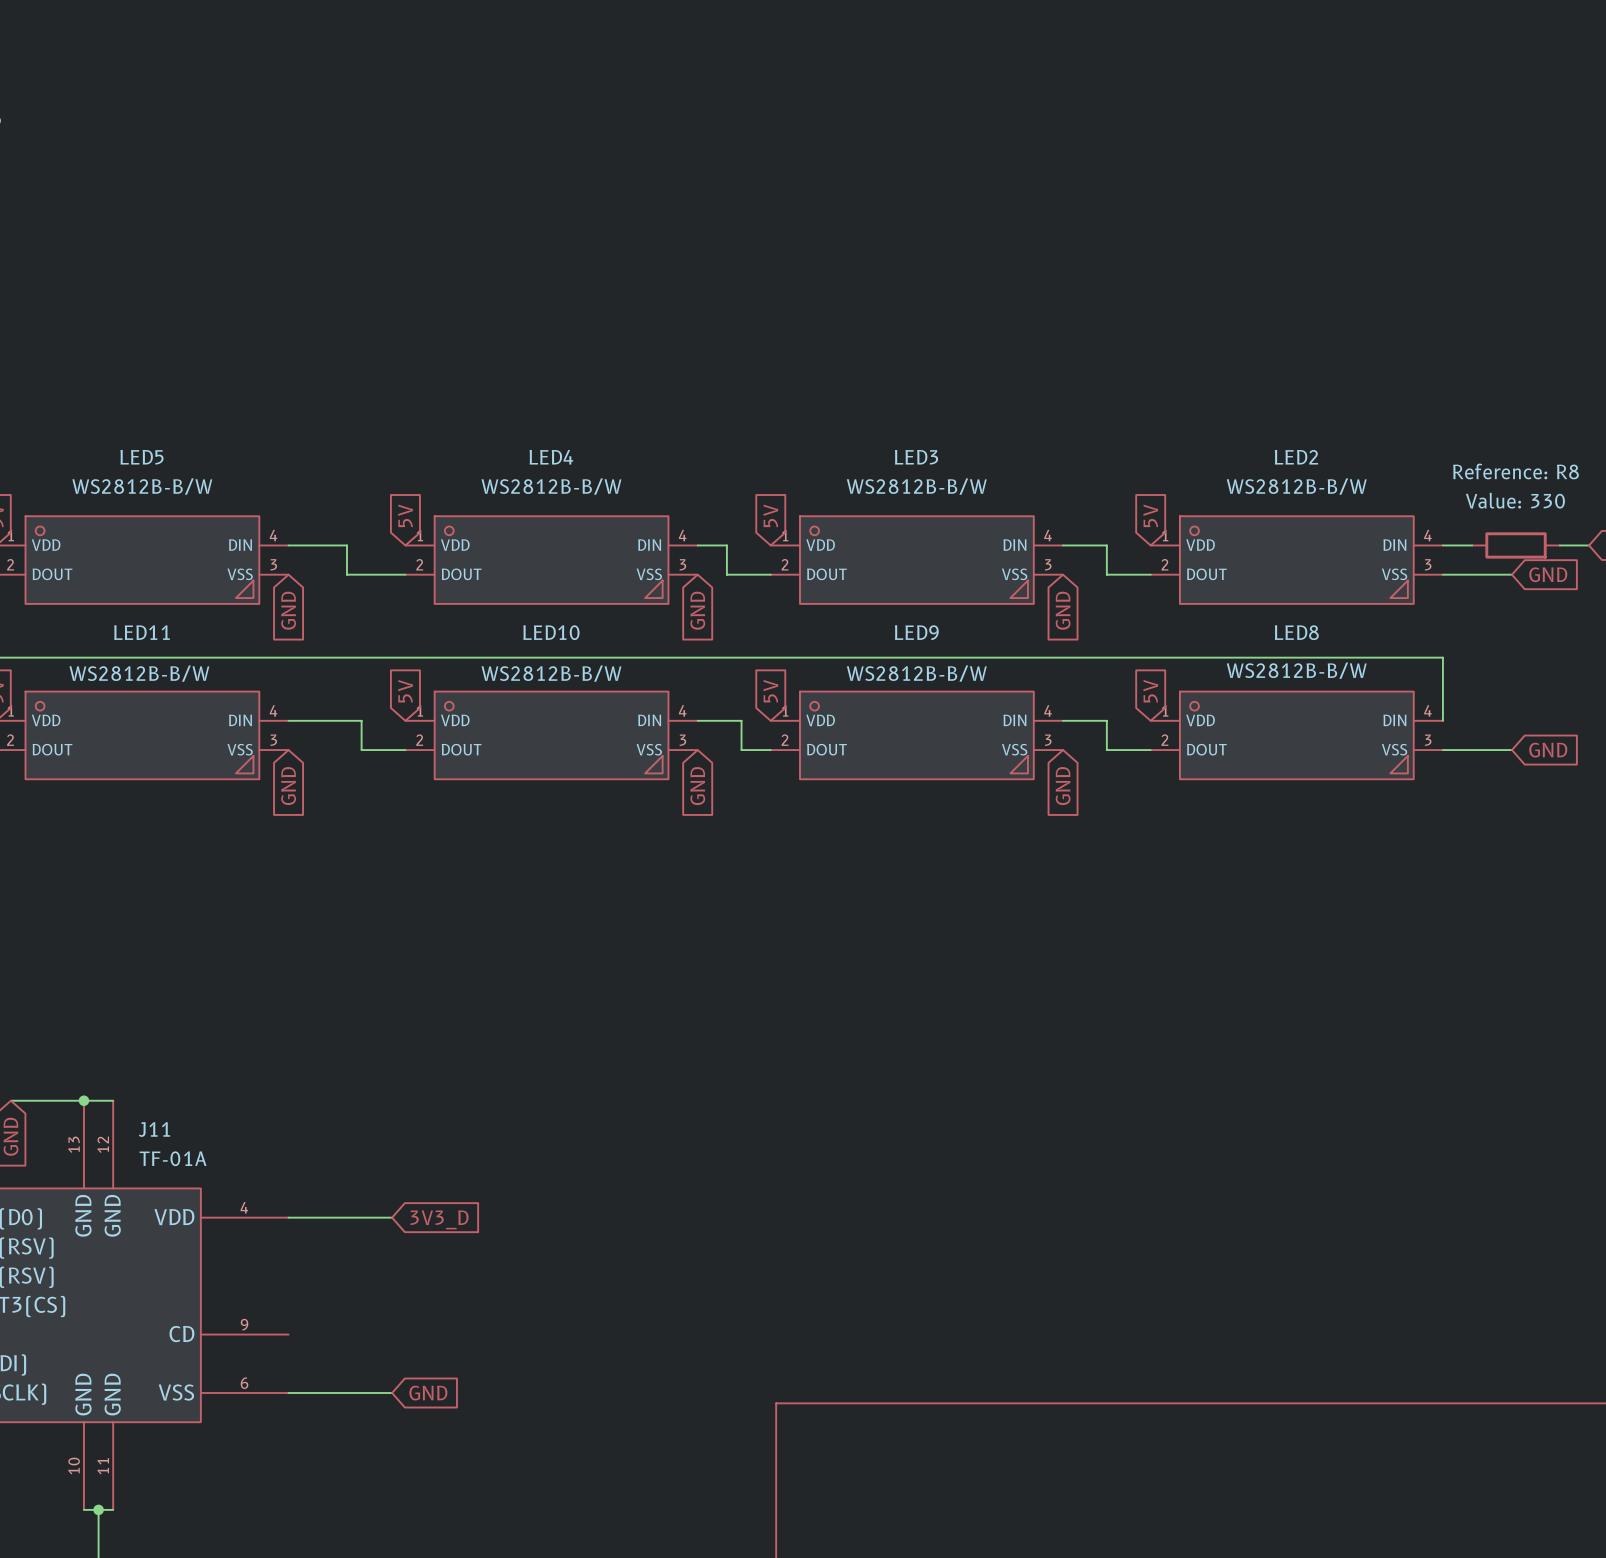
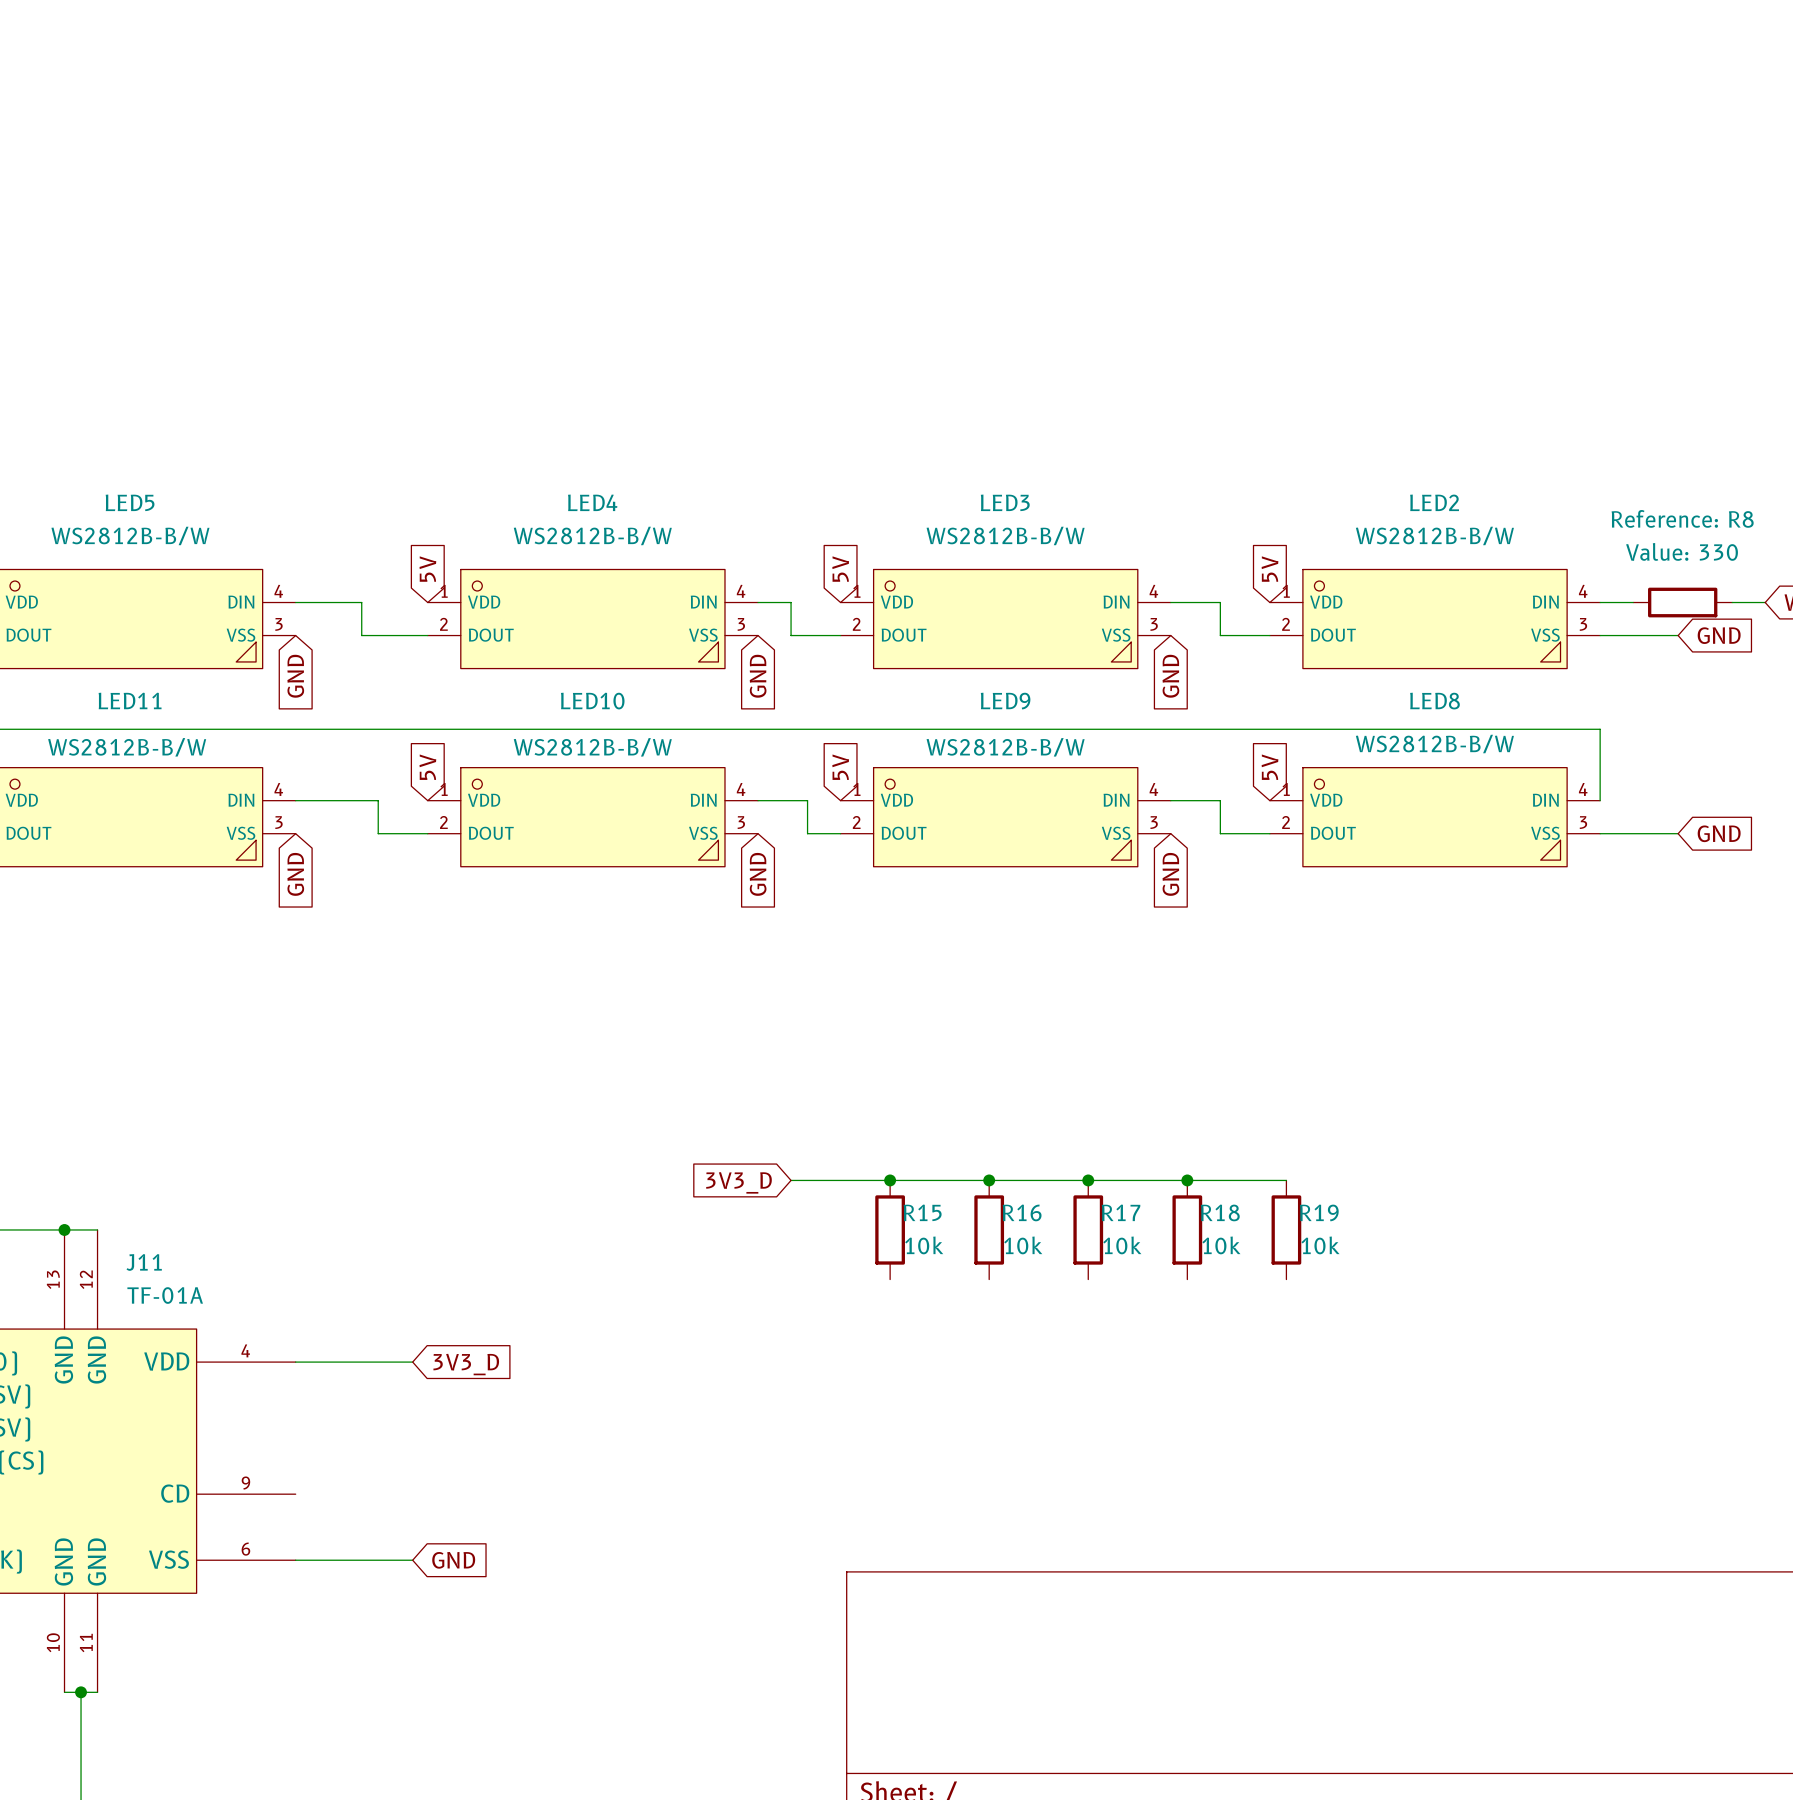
wire: none -> (791, 1180) (1286, 1180)
junction: none -> (890, 1180)
junction: none -> (989, 1180)
junction: none -> (1088, 1180)
junction: none -> (1187, 1180)
global label: none -> 3V3_D (739, 1182)
R15: none -> 10k (890, 1229)
R16: none -> 10k (989, 1229)
R17: none -> 10k (1088, 1229)
R18: none -> 10k (1187, 1229)
R19: none -> 10k (1286, 1229)

